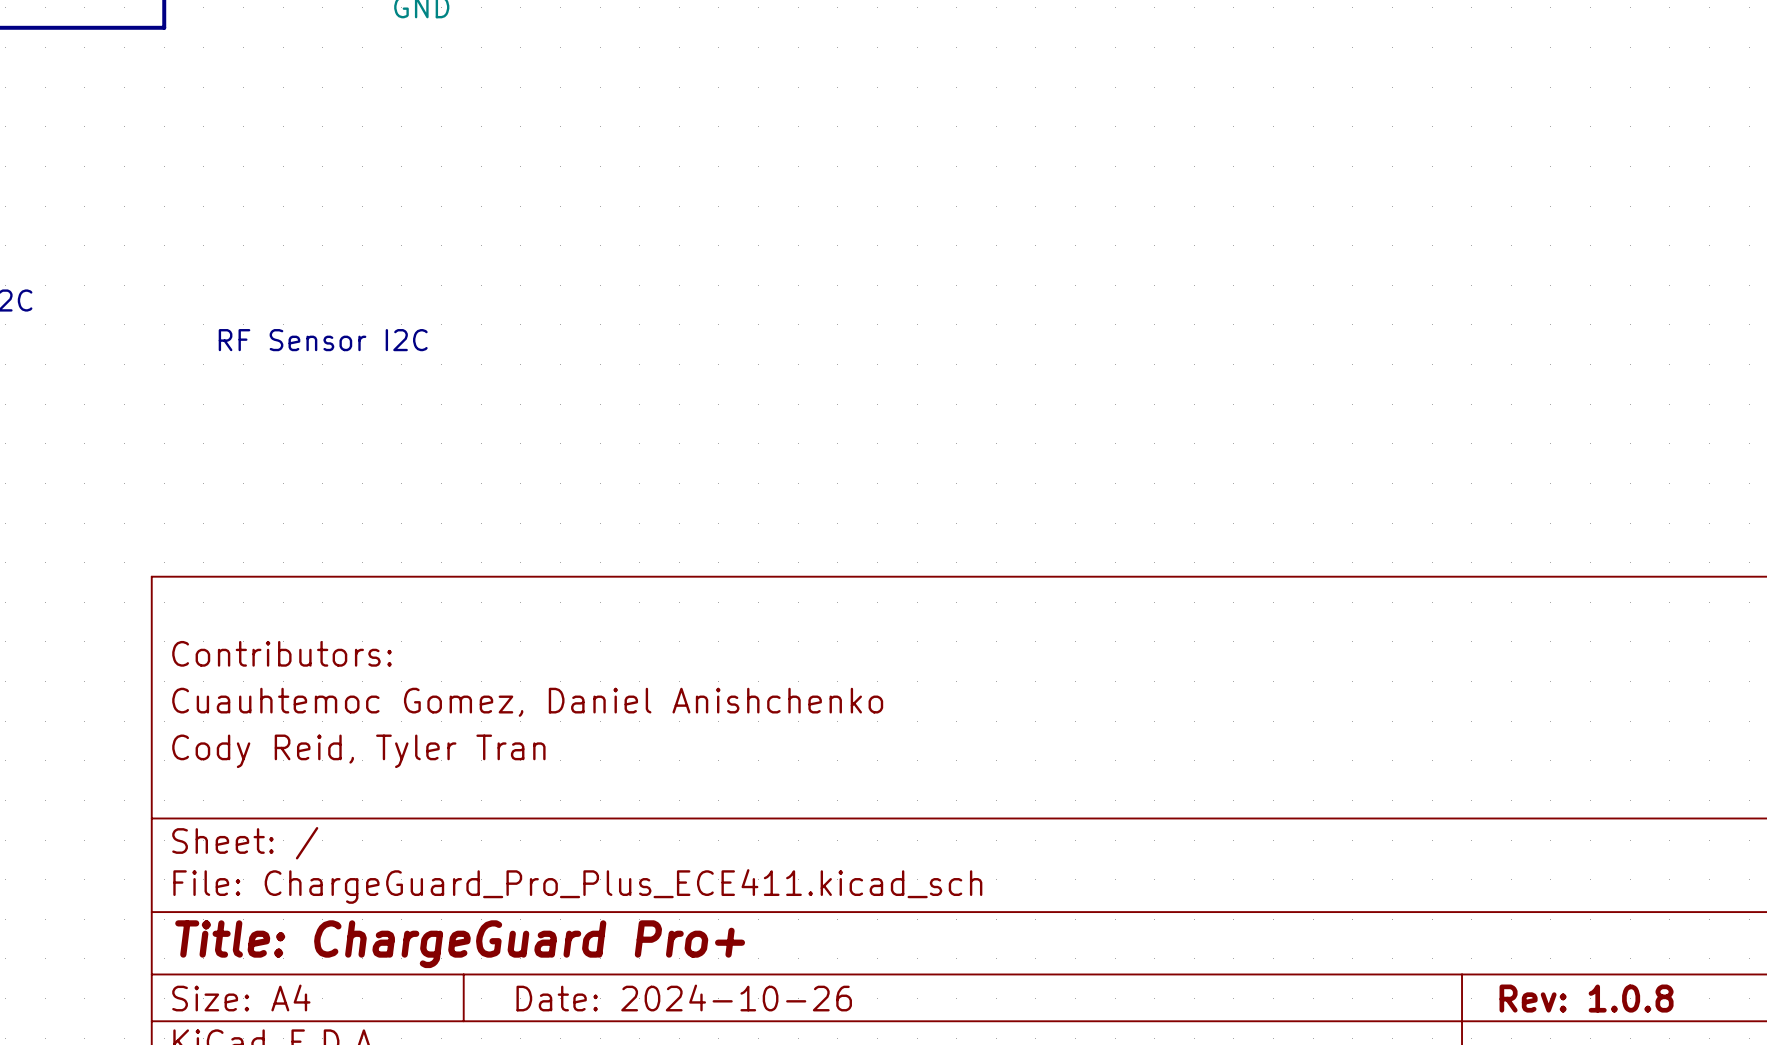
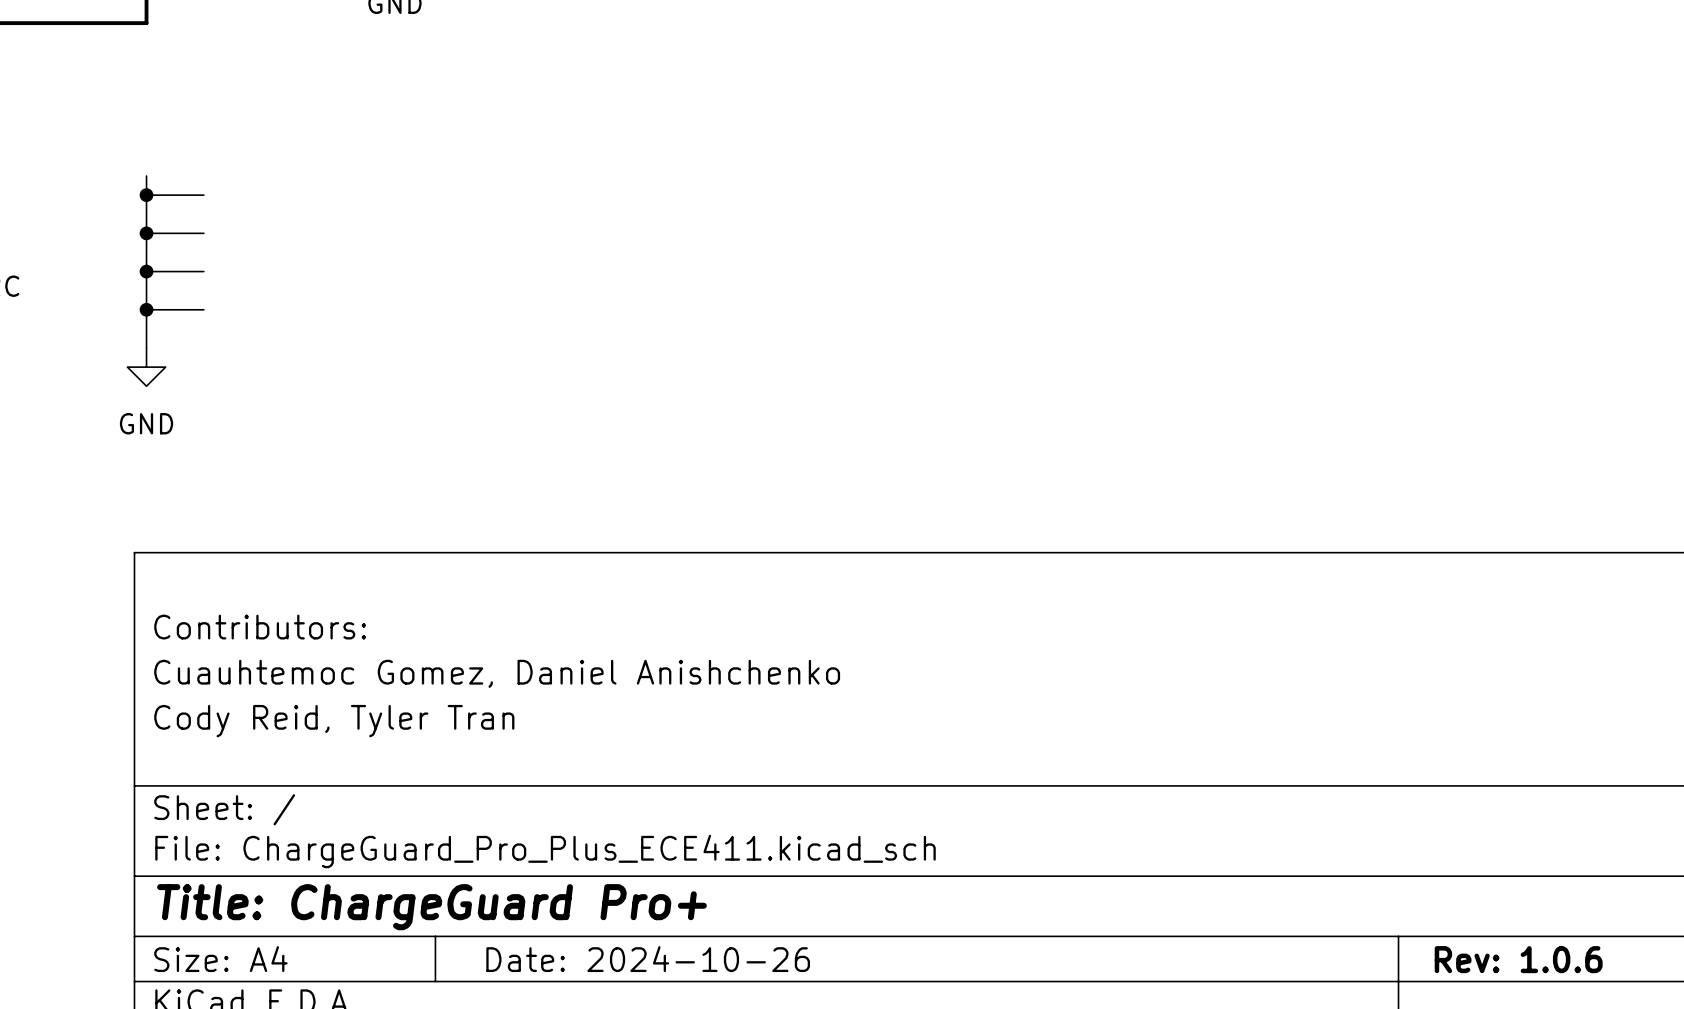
wire: none -> (146, 176) (146, 348)
wire: none -> (146, 195) (203, 195)
junction: none -> (146, 195)
wire: none -> (146, 233) (203, 233)
junction: none -> (146, 233)
wire: none -> (146, 271) (203, 271)
junction: none -> (146, 271)
wire: none -> (146, 309) (203, 309)
junction: none -> (146, 309)
text: RF Sensor I2C (323, 340) -> none
power symbol: none -> GND (146, 367)
title block: Rev: 1.0.8 (1586, 998) -> Rev: 1.0.6 (1518, 959)

